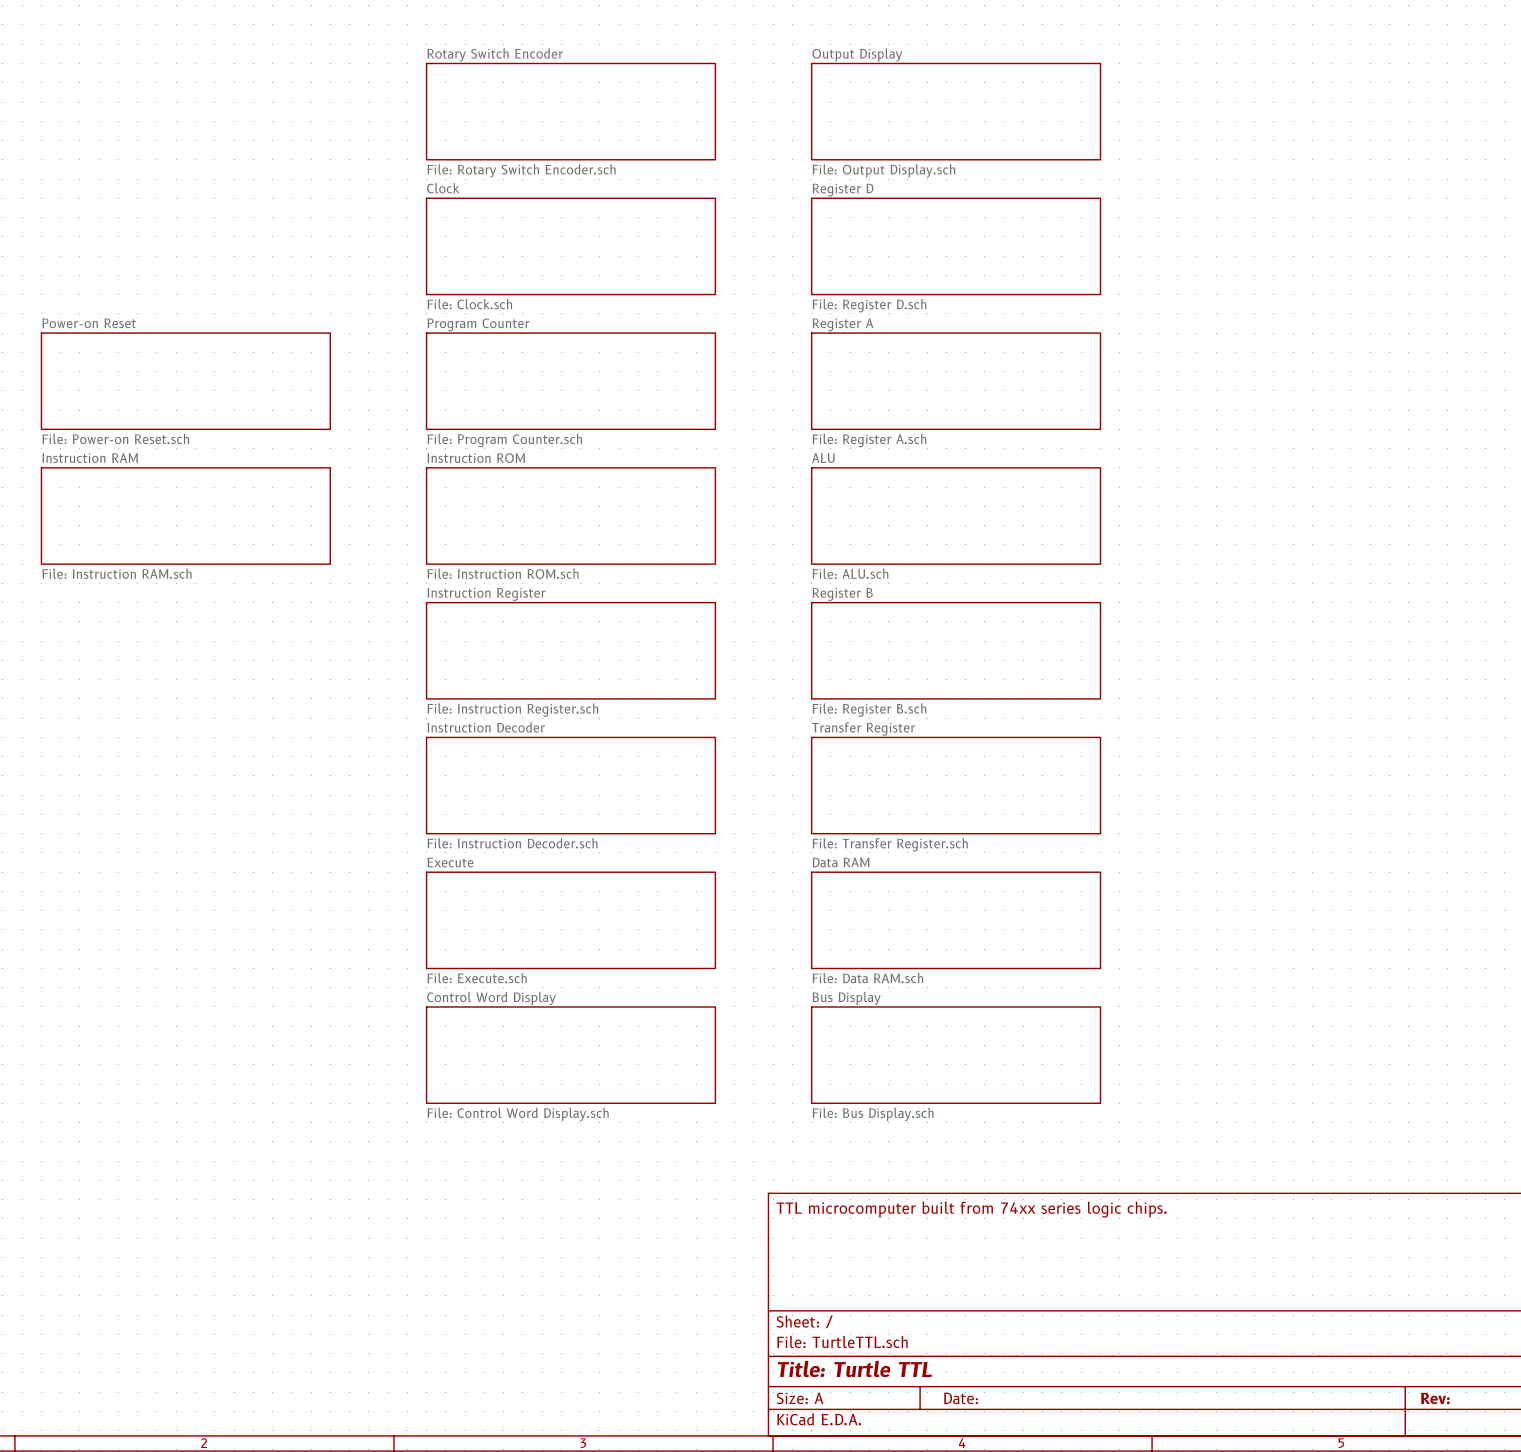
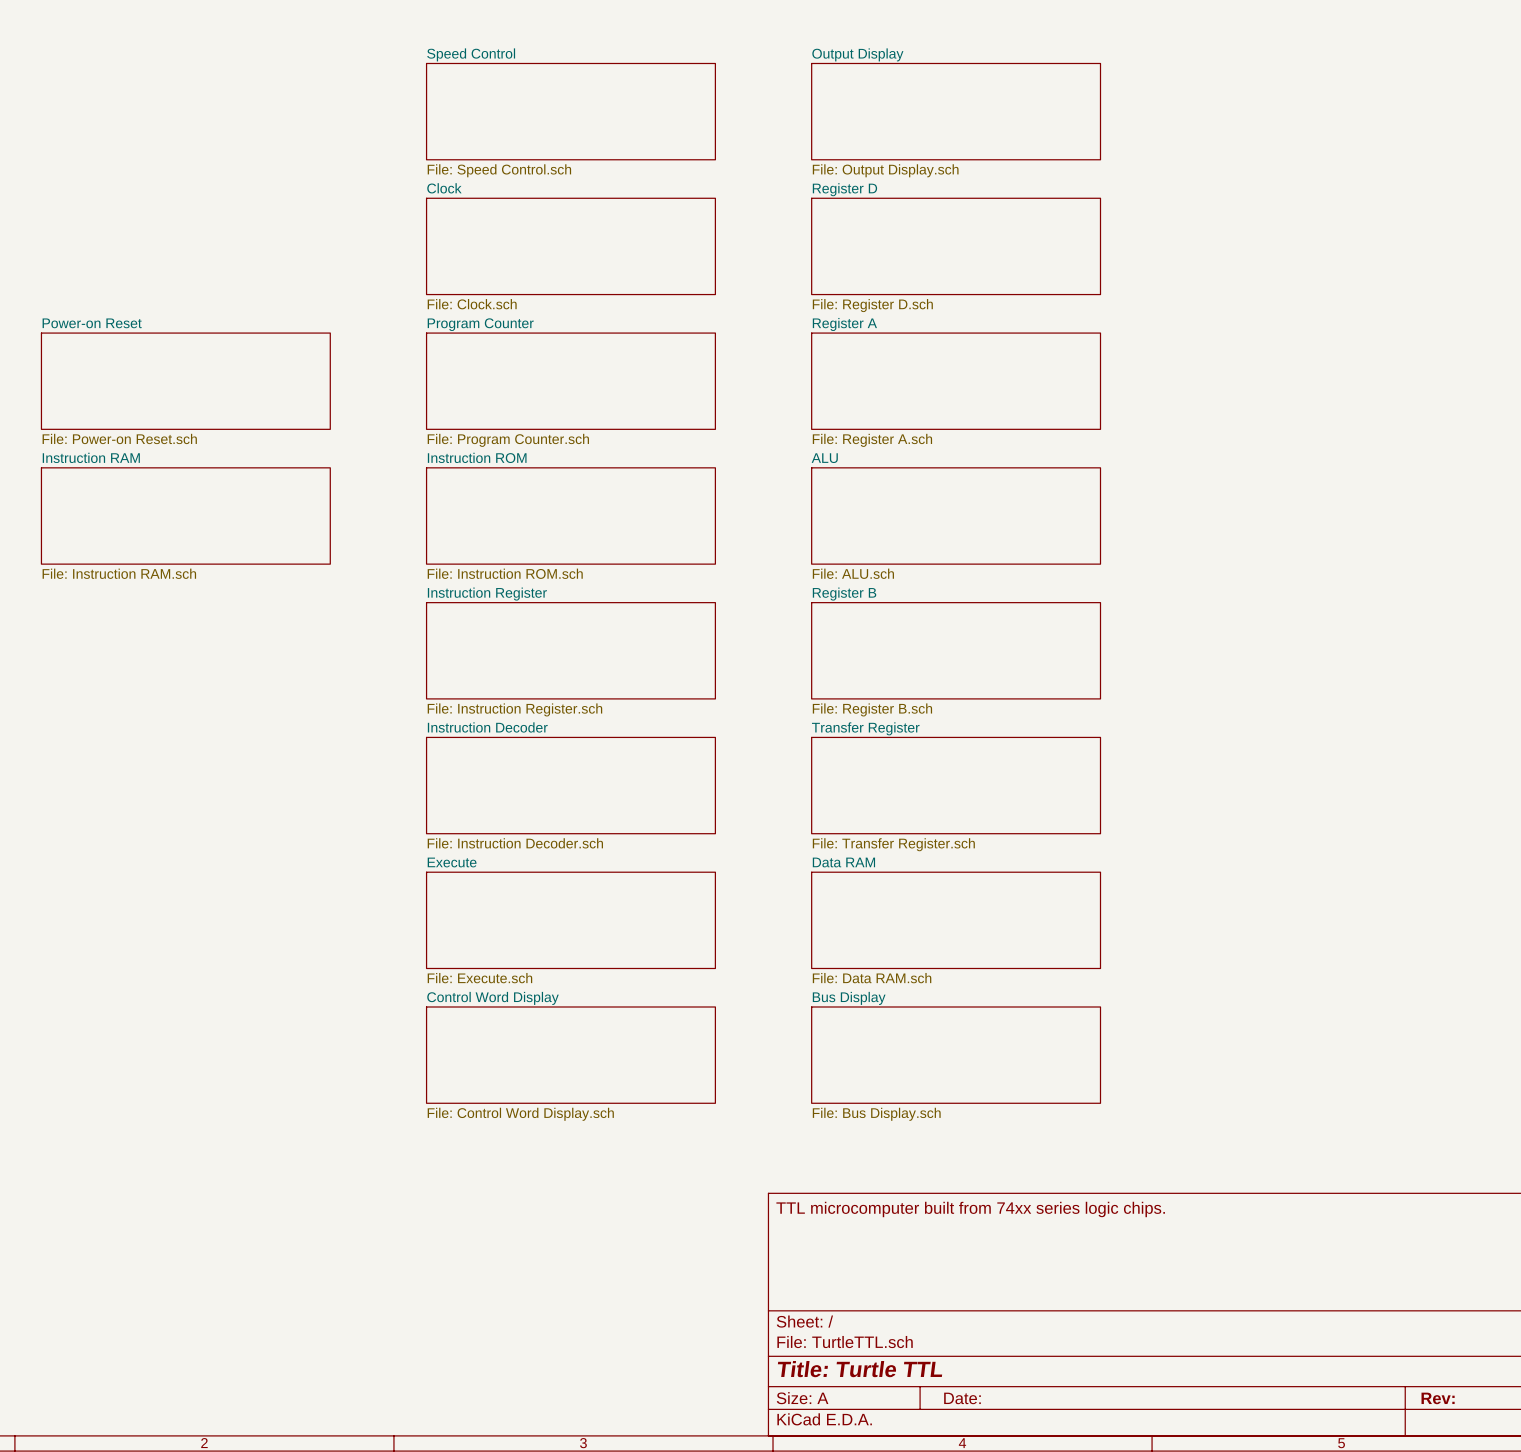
sheet Rotary Switch Encoder name: Rotary Switch Encoder (495, 54) -> Speed Control (471, 54)
sheet Rotary Switch Encoder value: File: Rotary Switch Encoder.sch (521, 170) -> File: Speed Control.sch (499, 170)

